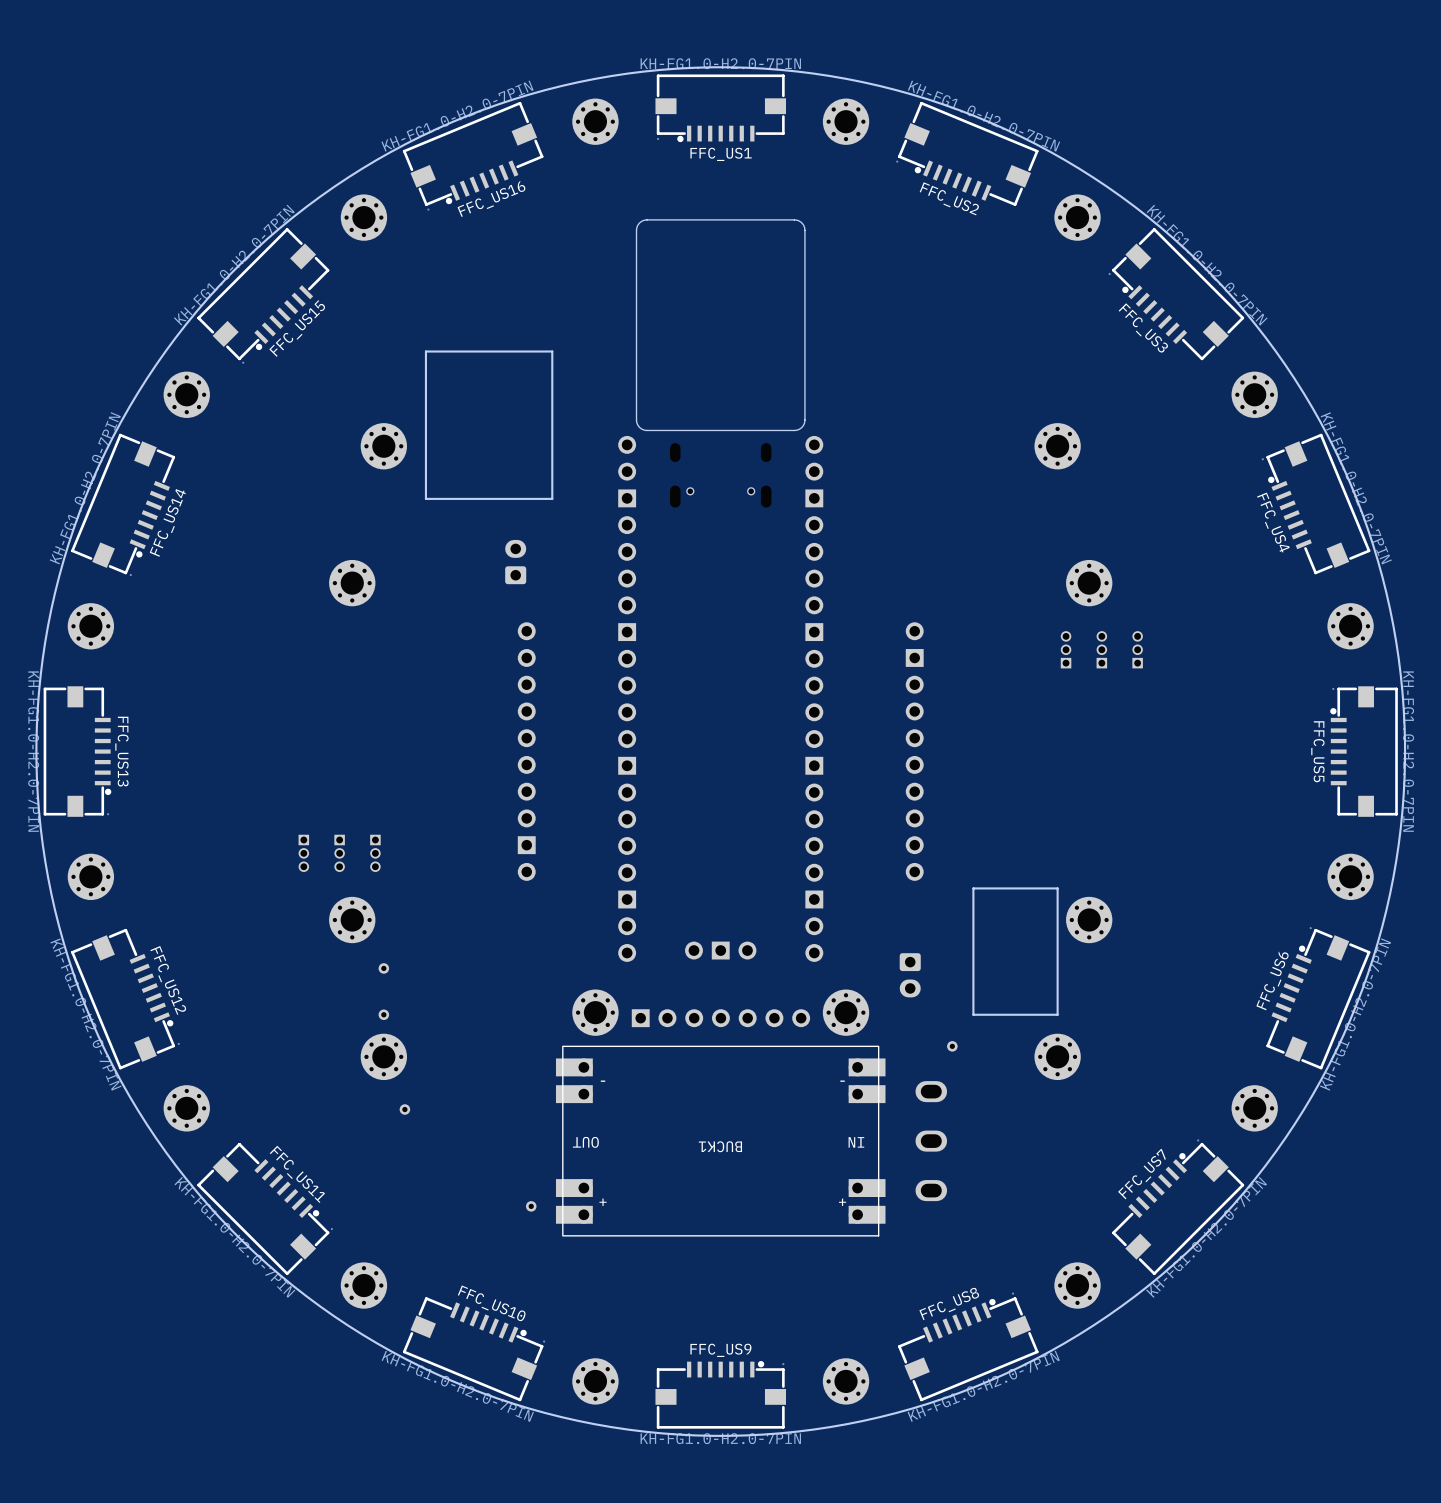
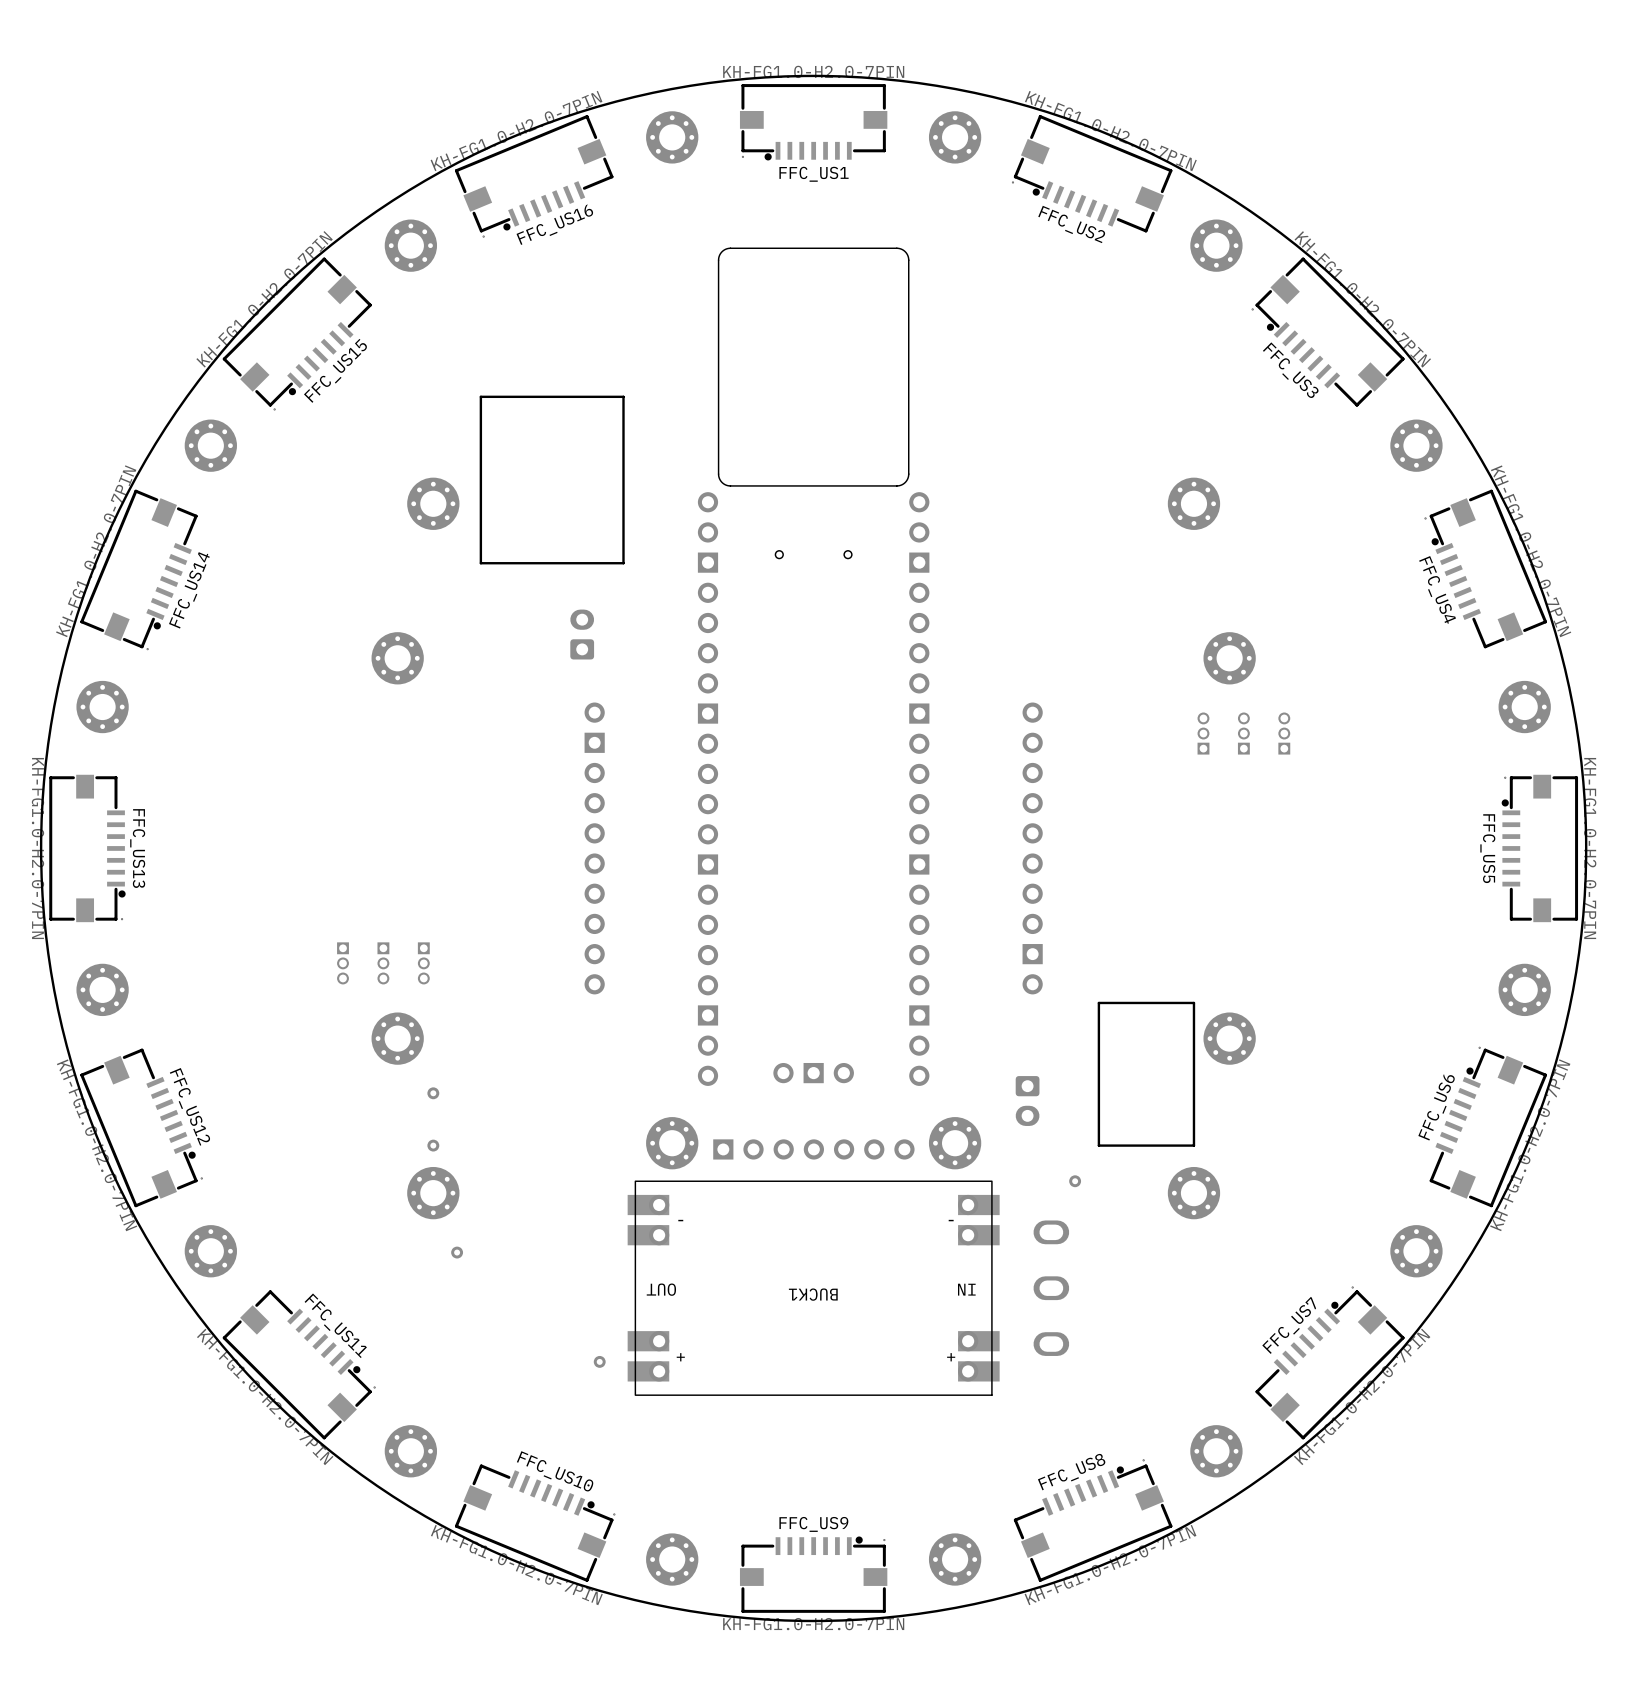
part rotation: 0° (526, 751) -> 180° (594, 848)
part rotation: 0° (914, 751) -> 180° (1032, 848)

